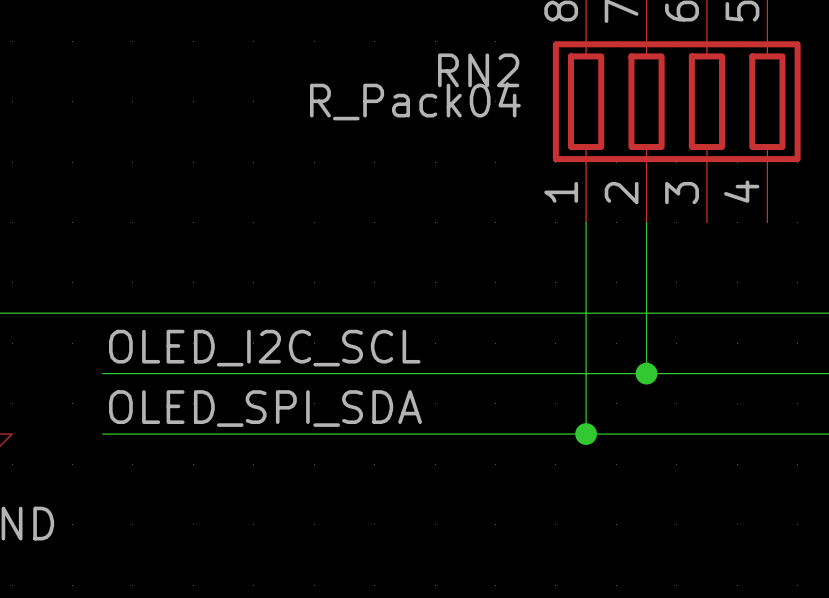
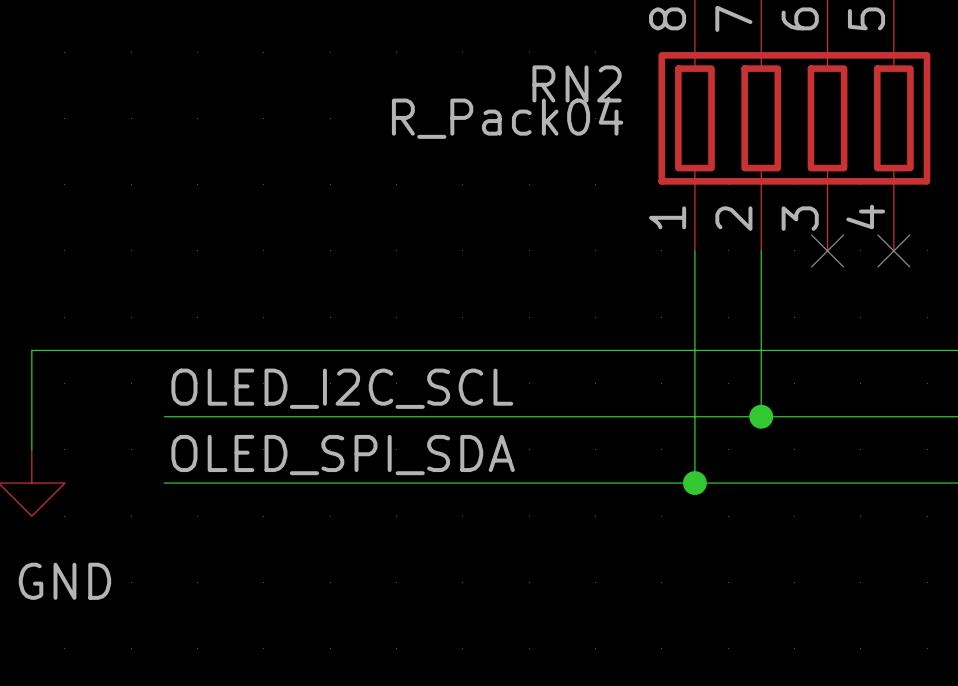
no-connect mark: none -> (827, 250)
no-connect mark: none -> (893, 250)

